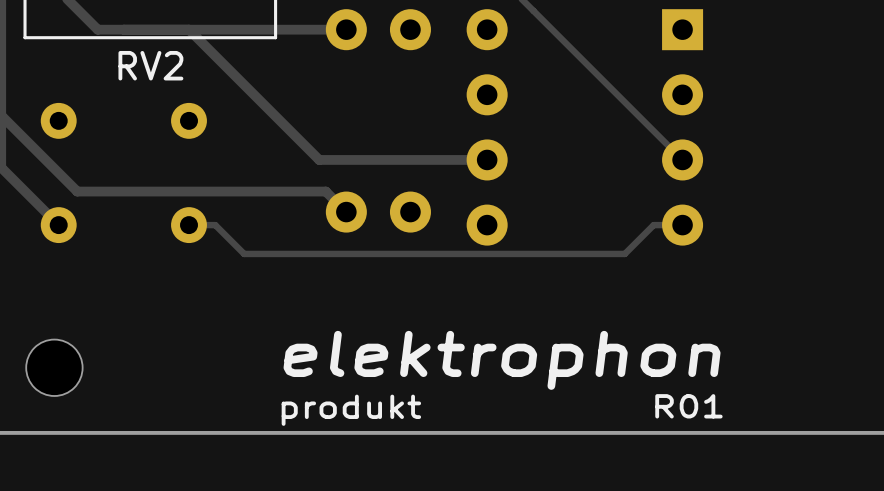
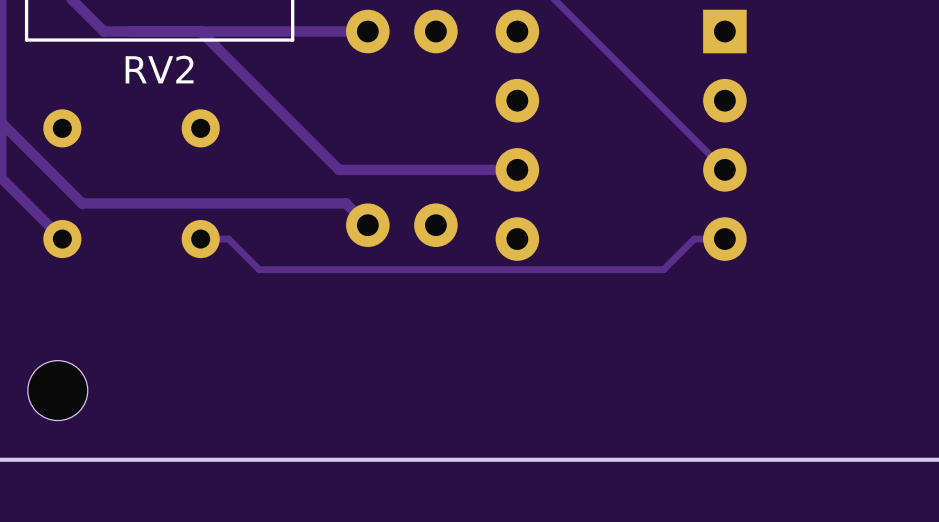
drawing: [281, 330, 723, 426] -> none

